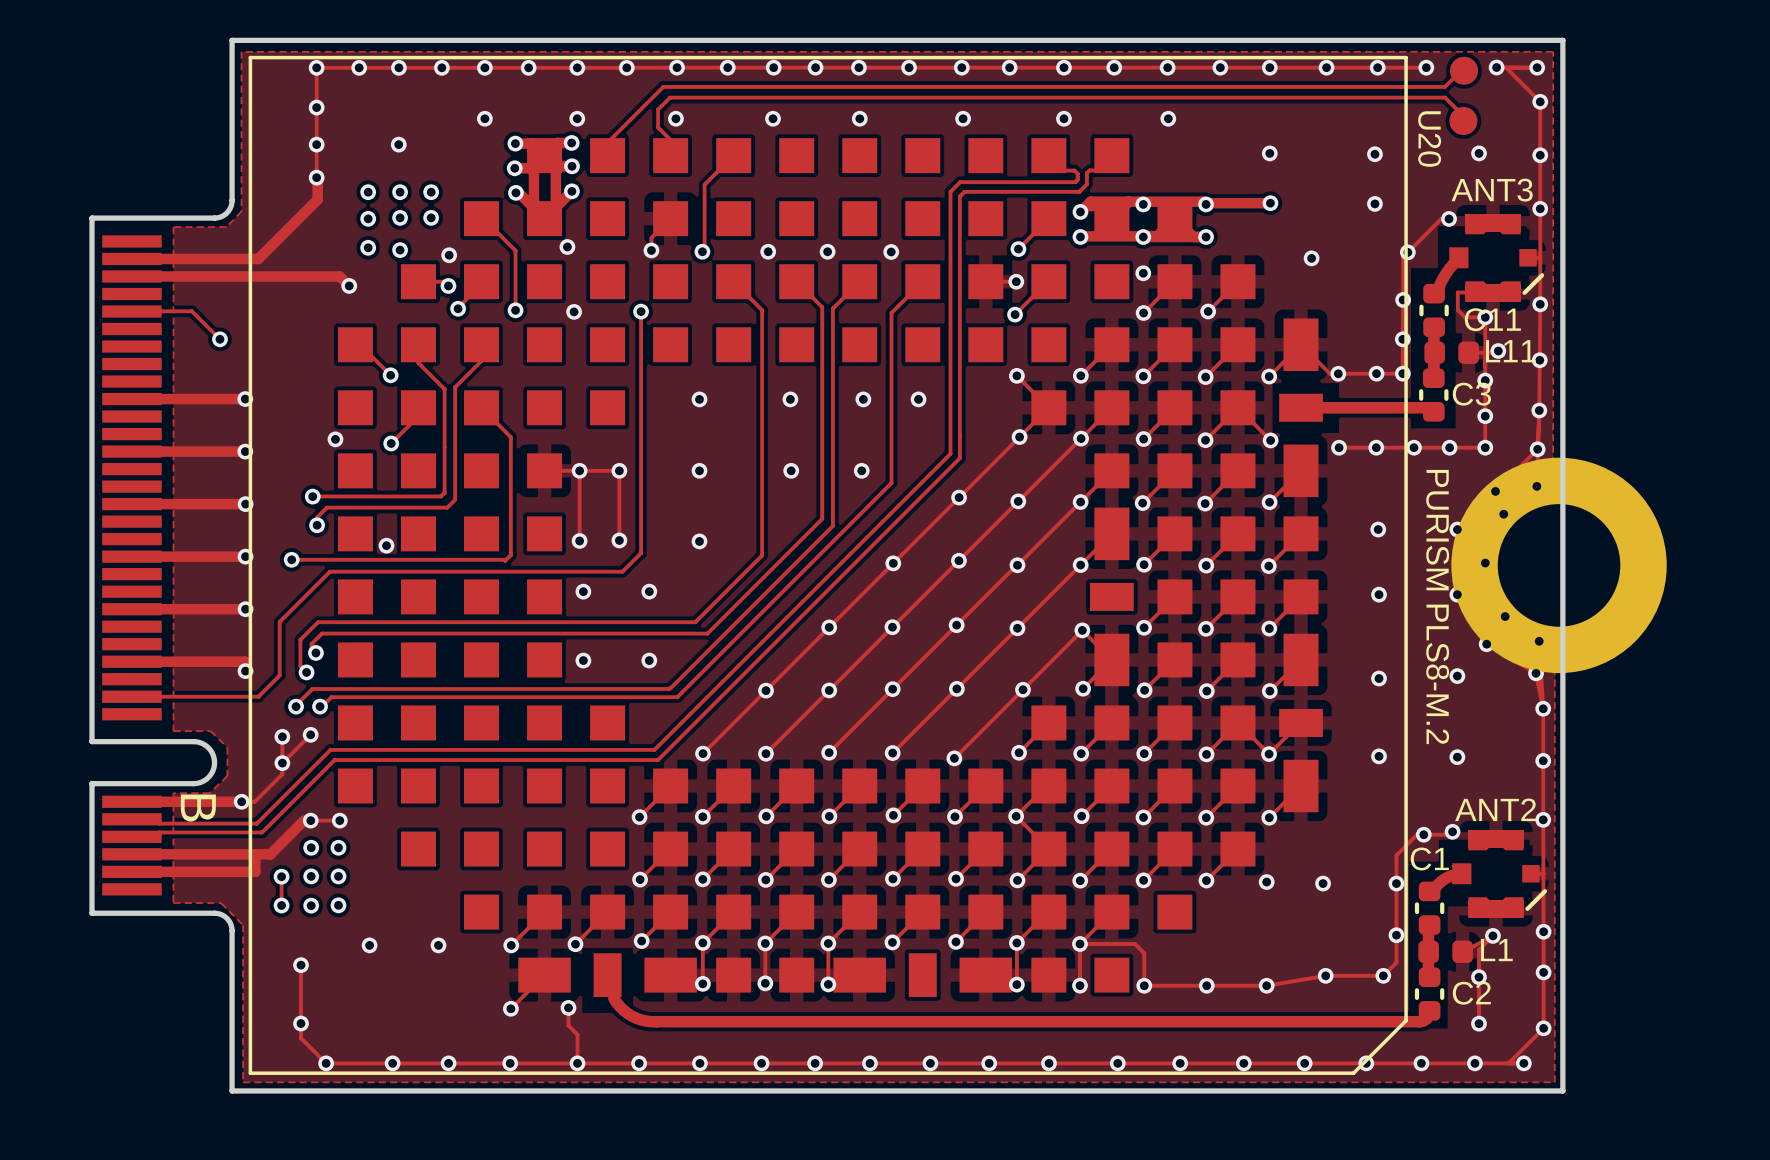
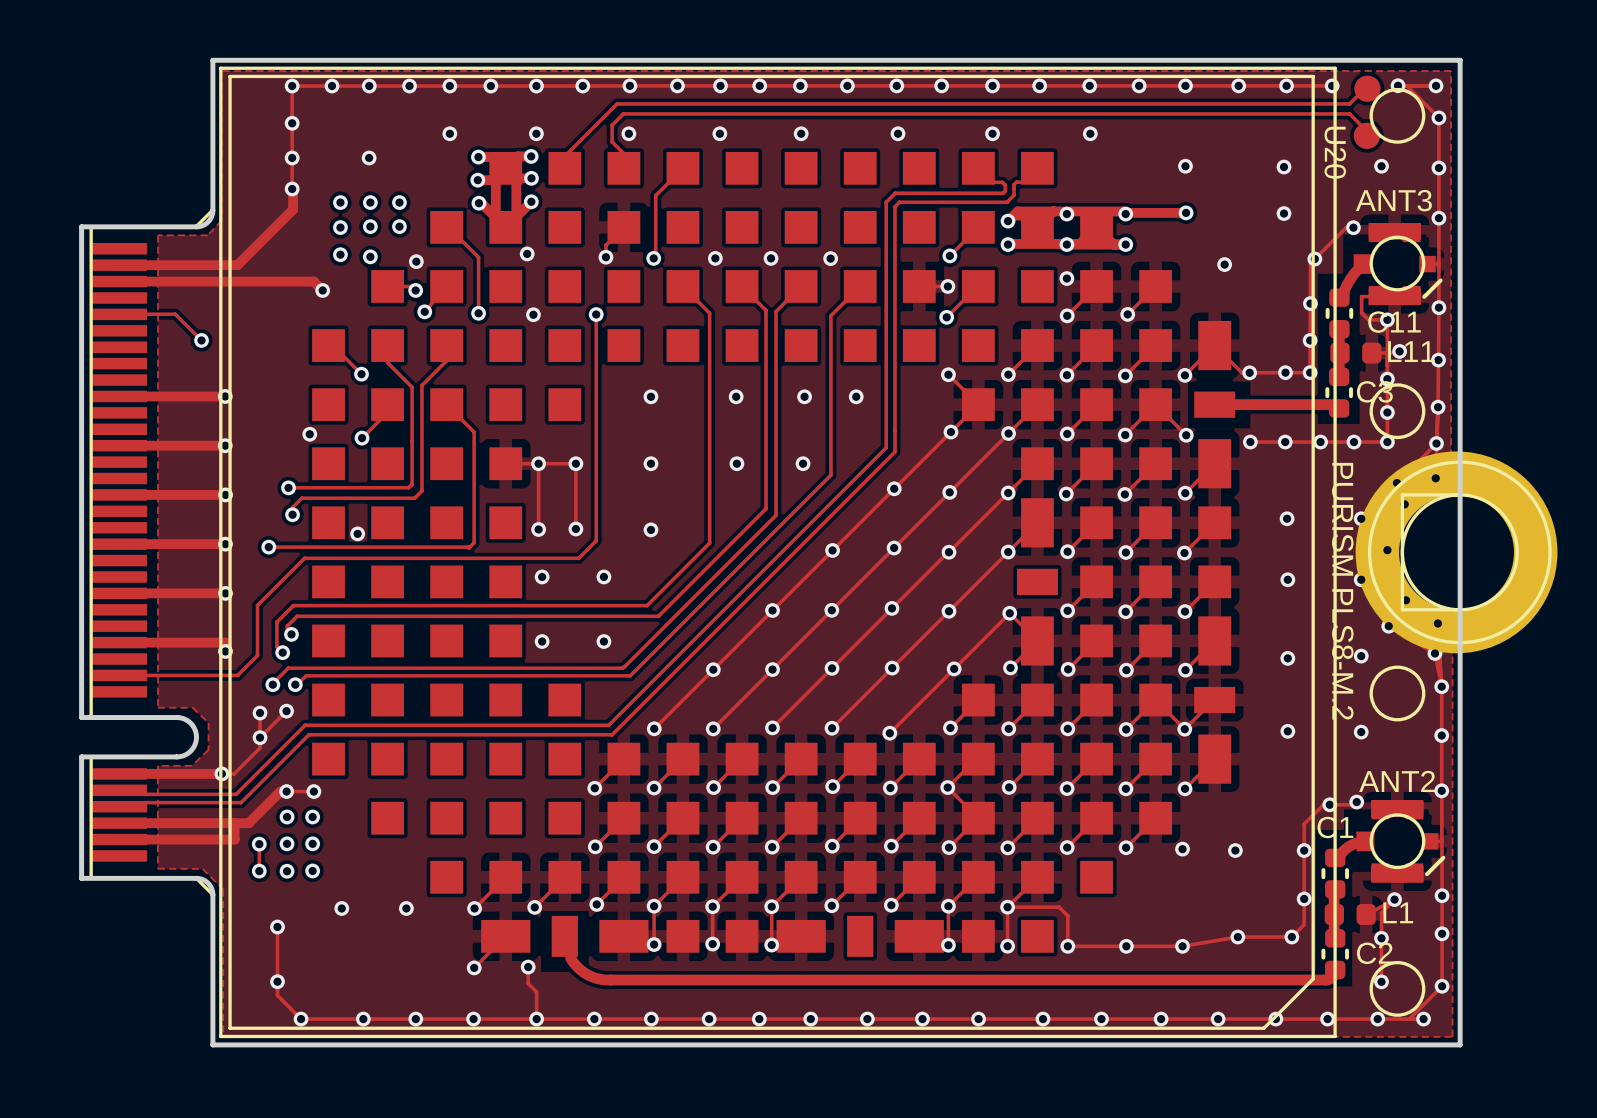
part: (131, 565) -> none
part: none -> (815, 552)
text: B (198, 808) -> none

